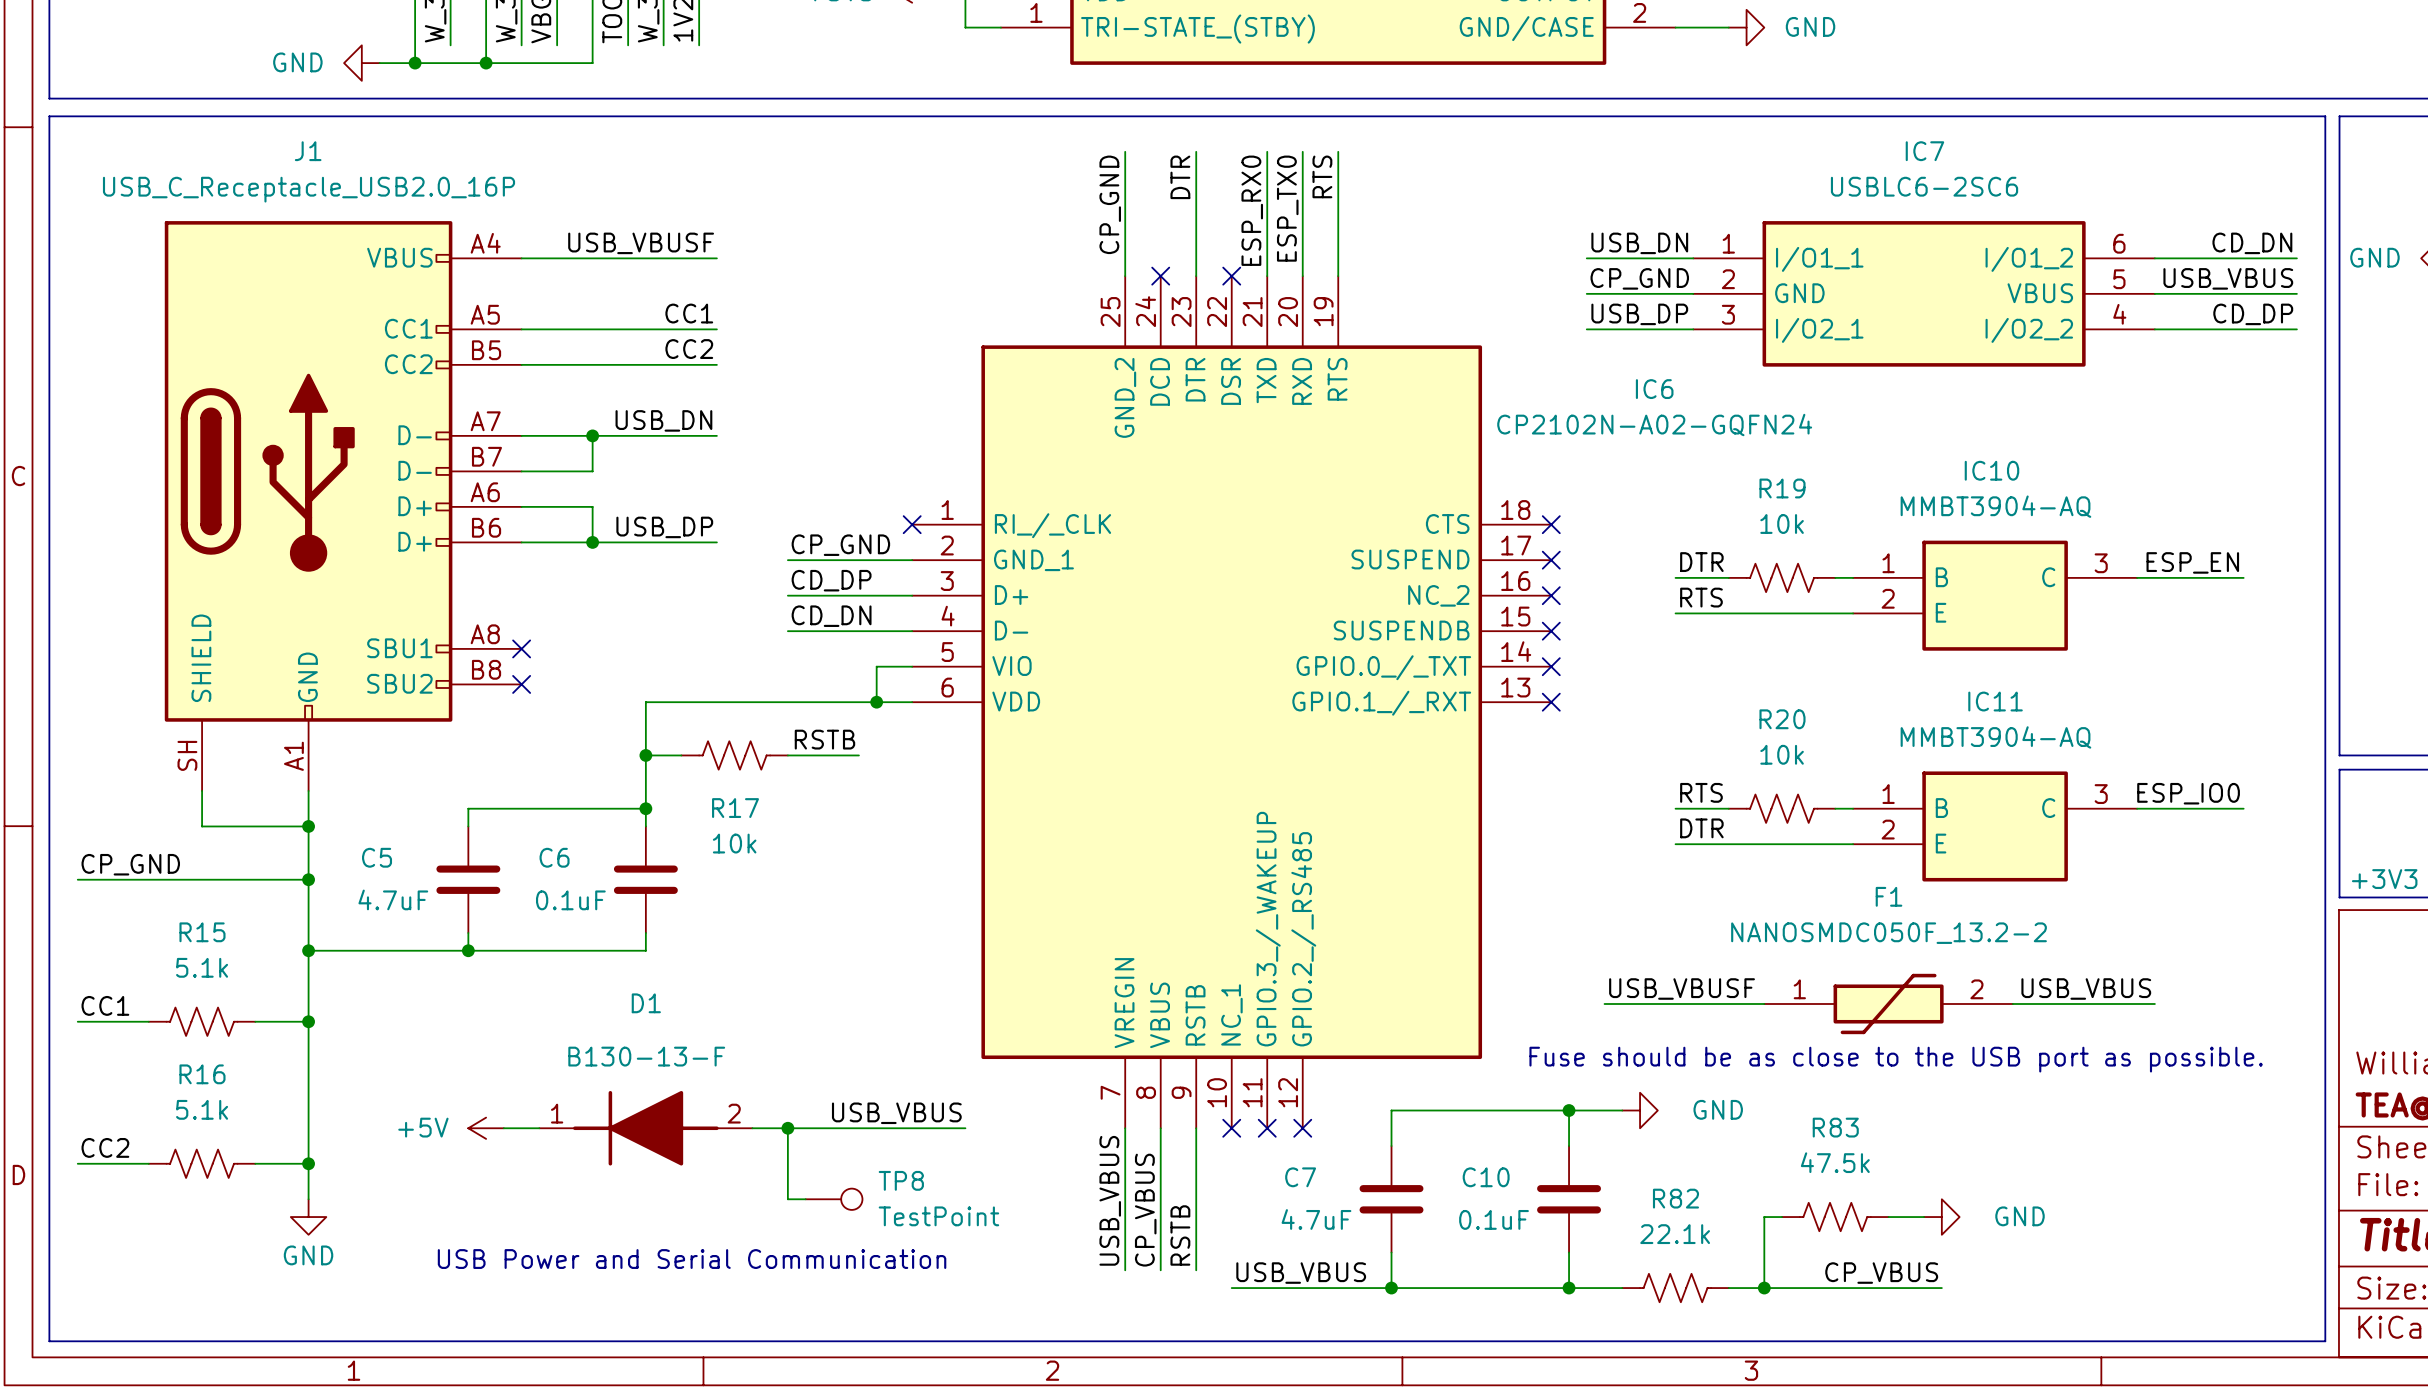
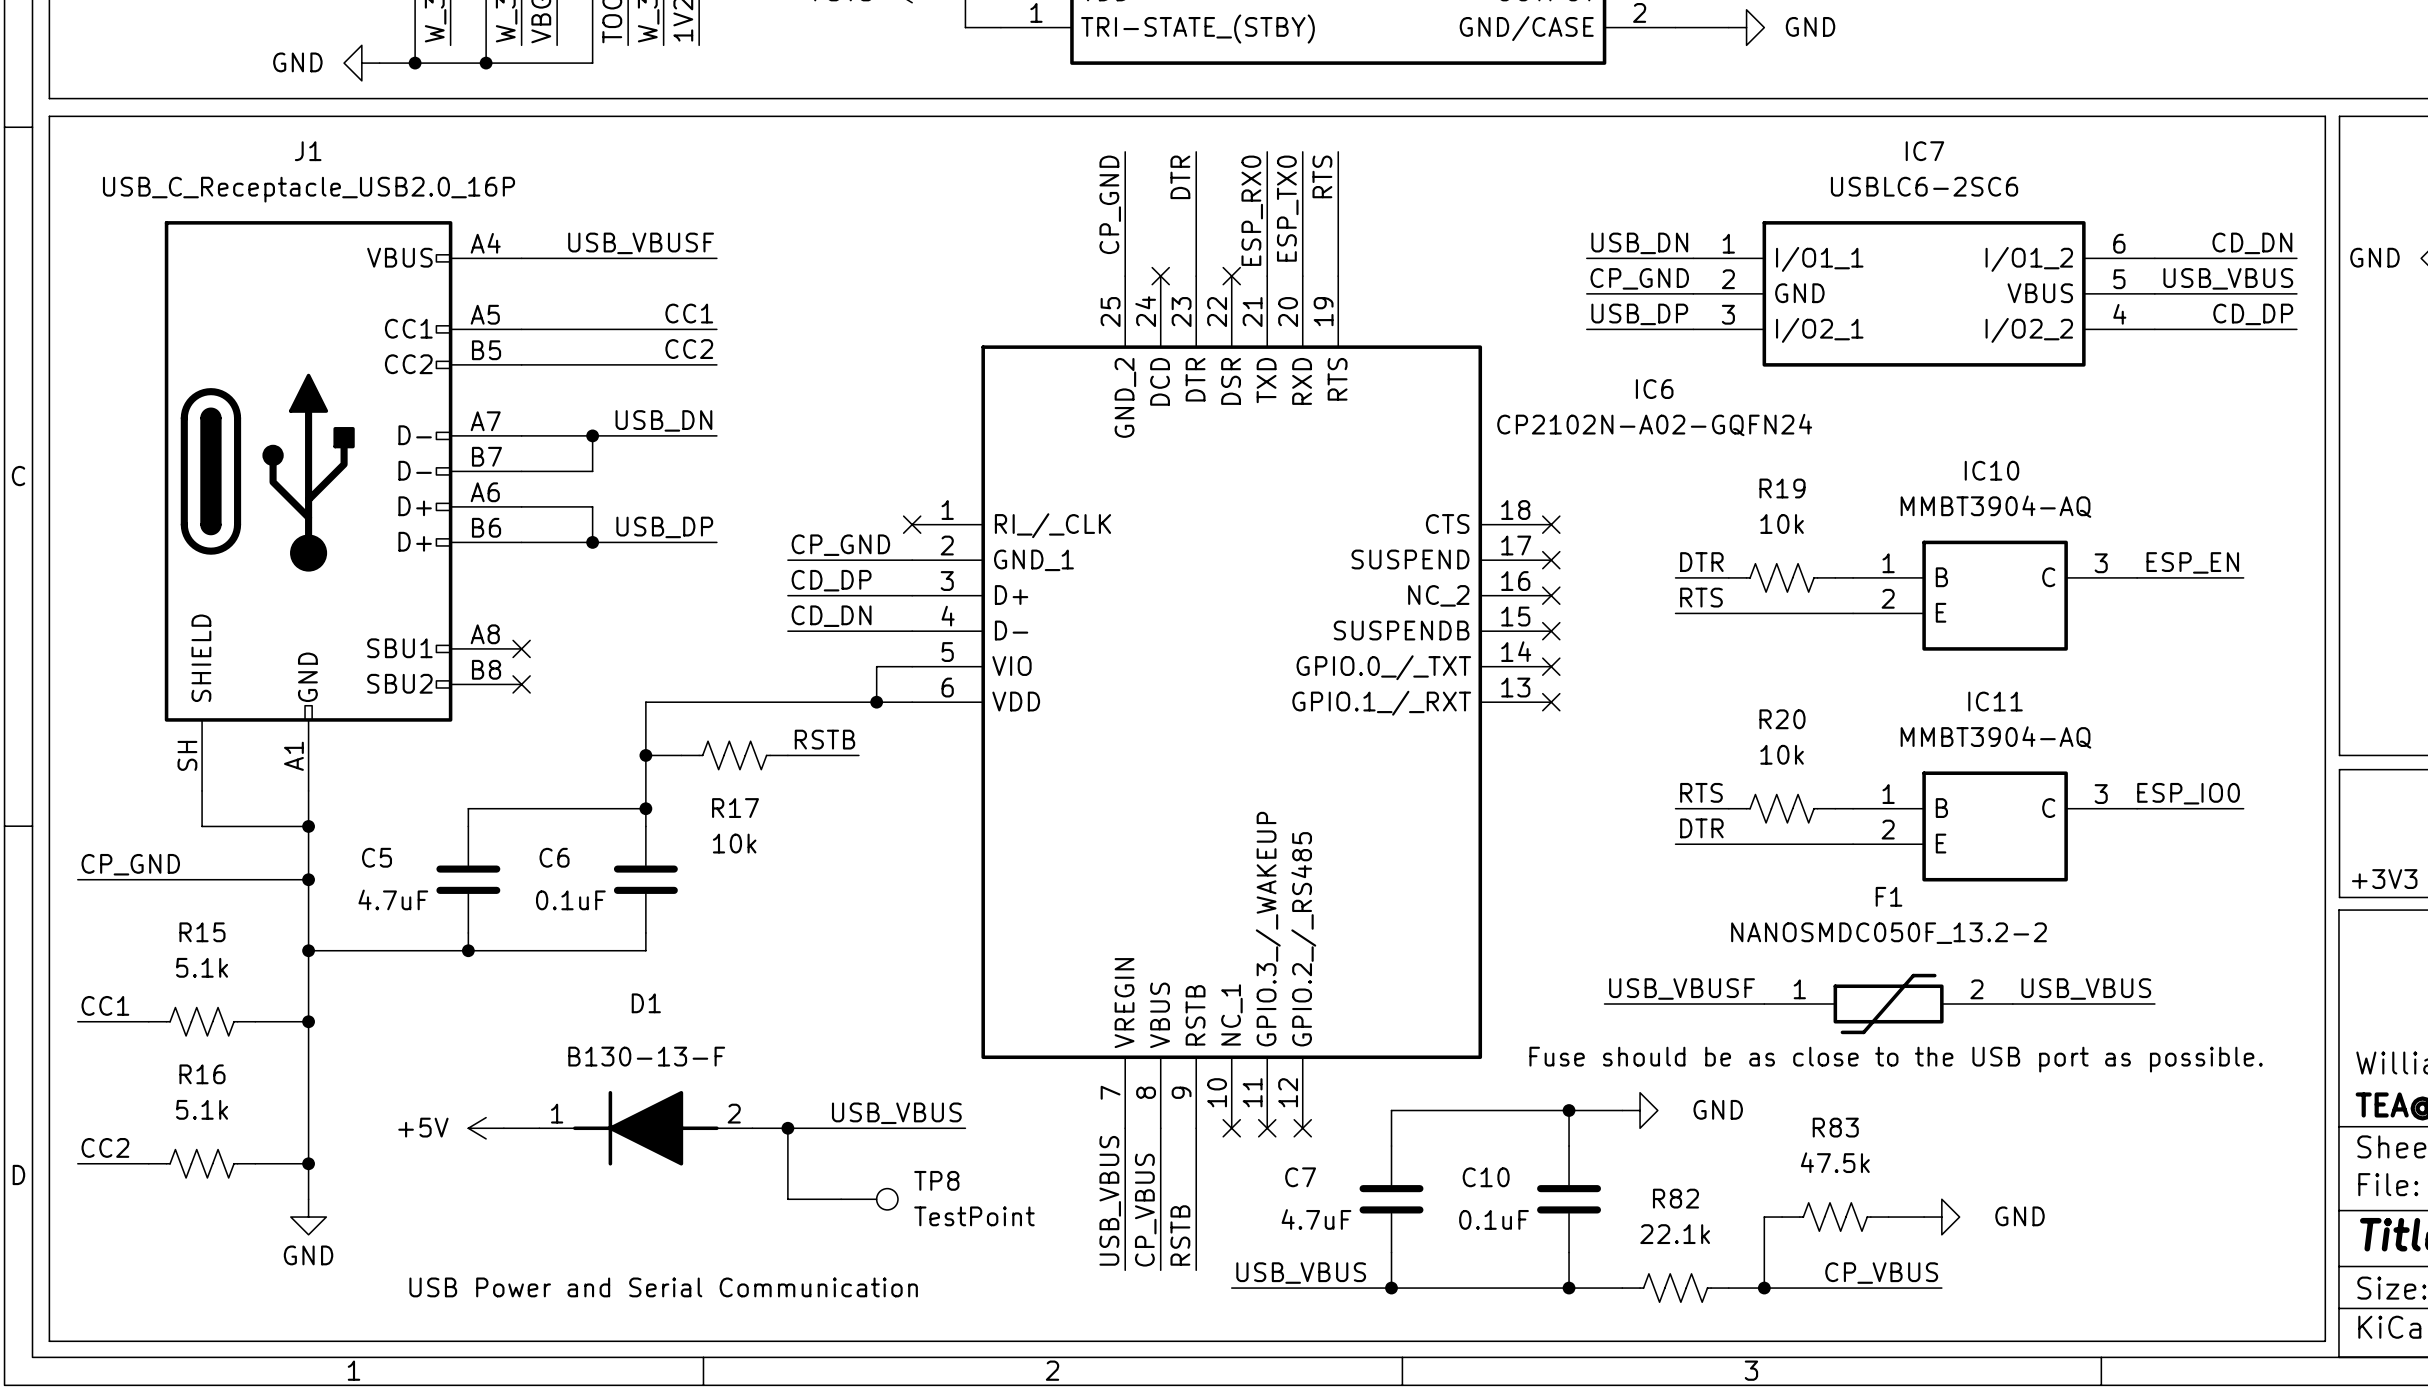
TP8 position: (834, 1199) -> (869, 1199)
text position: USB Power and Serial Communication (692, 1259) -> USB Power and Serial Communication (663, 1287)

